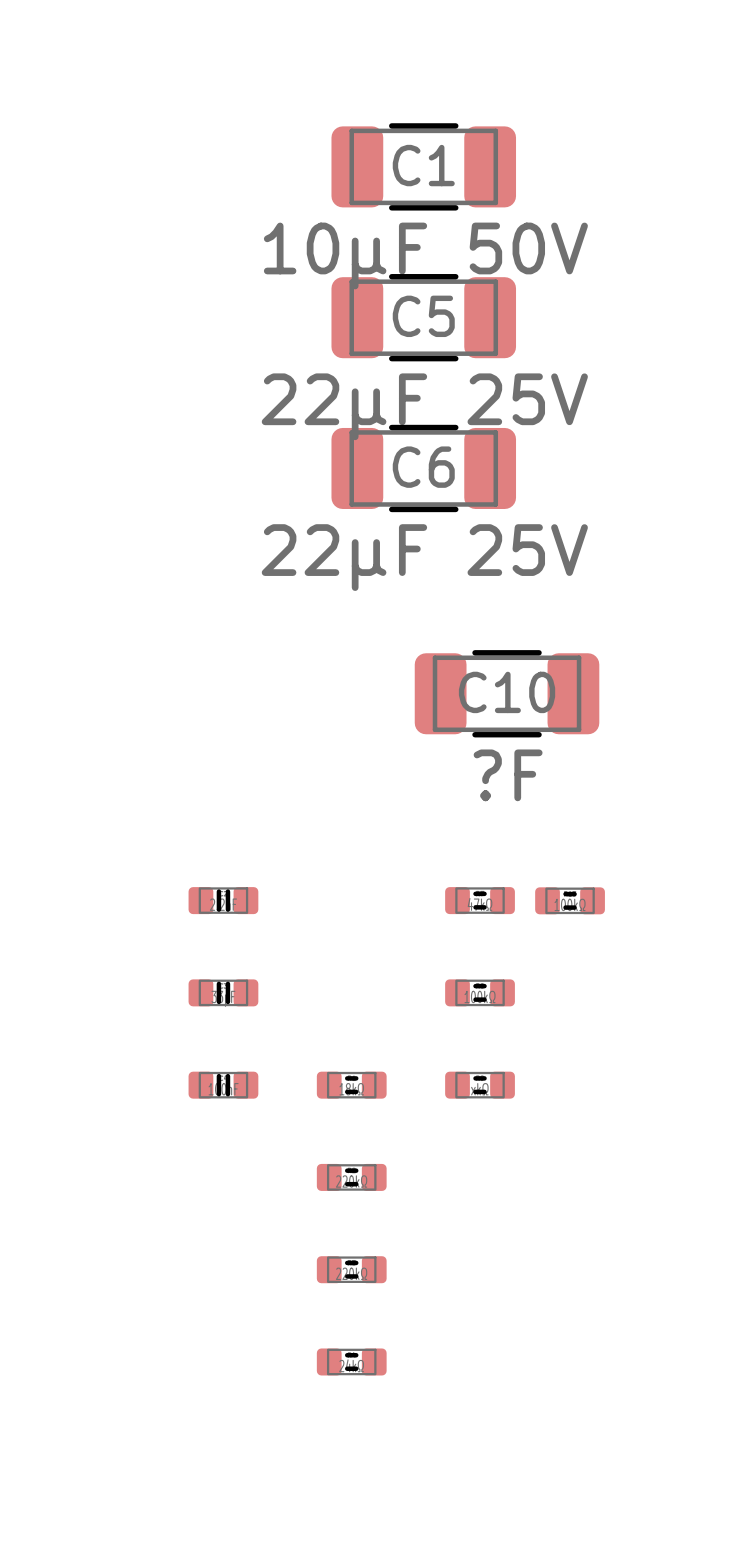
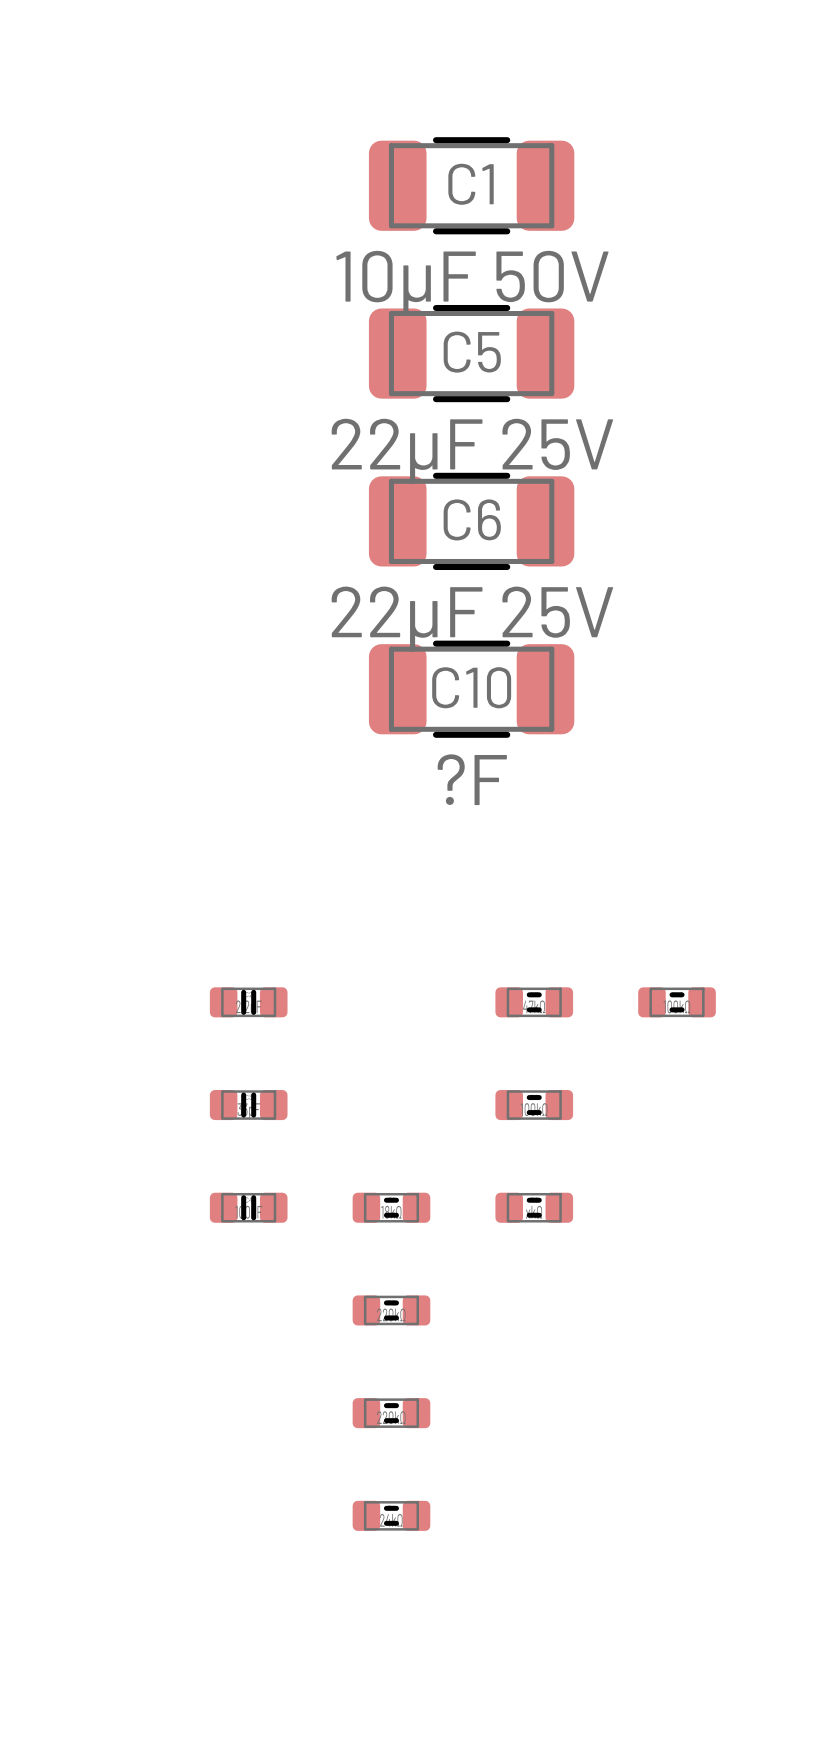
C10 position: (507, 693) -> (471, 689)
part position: (570, 900) -> (677, 1002)

